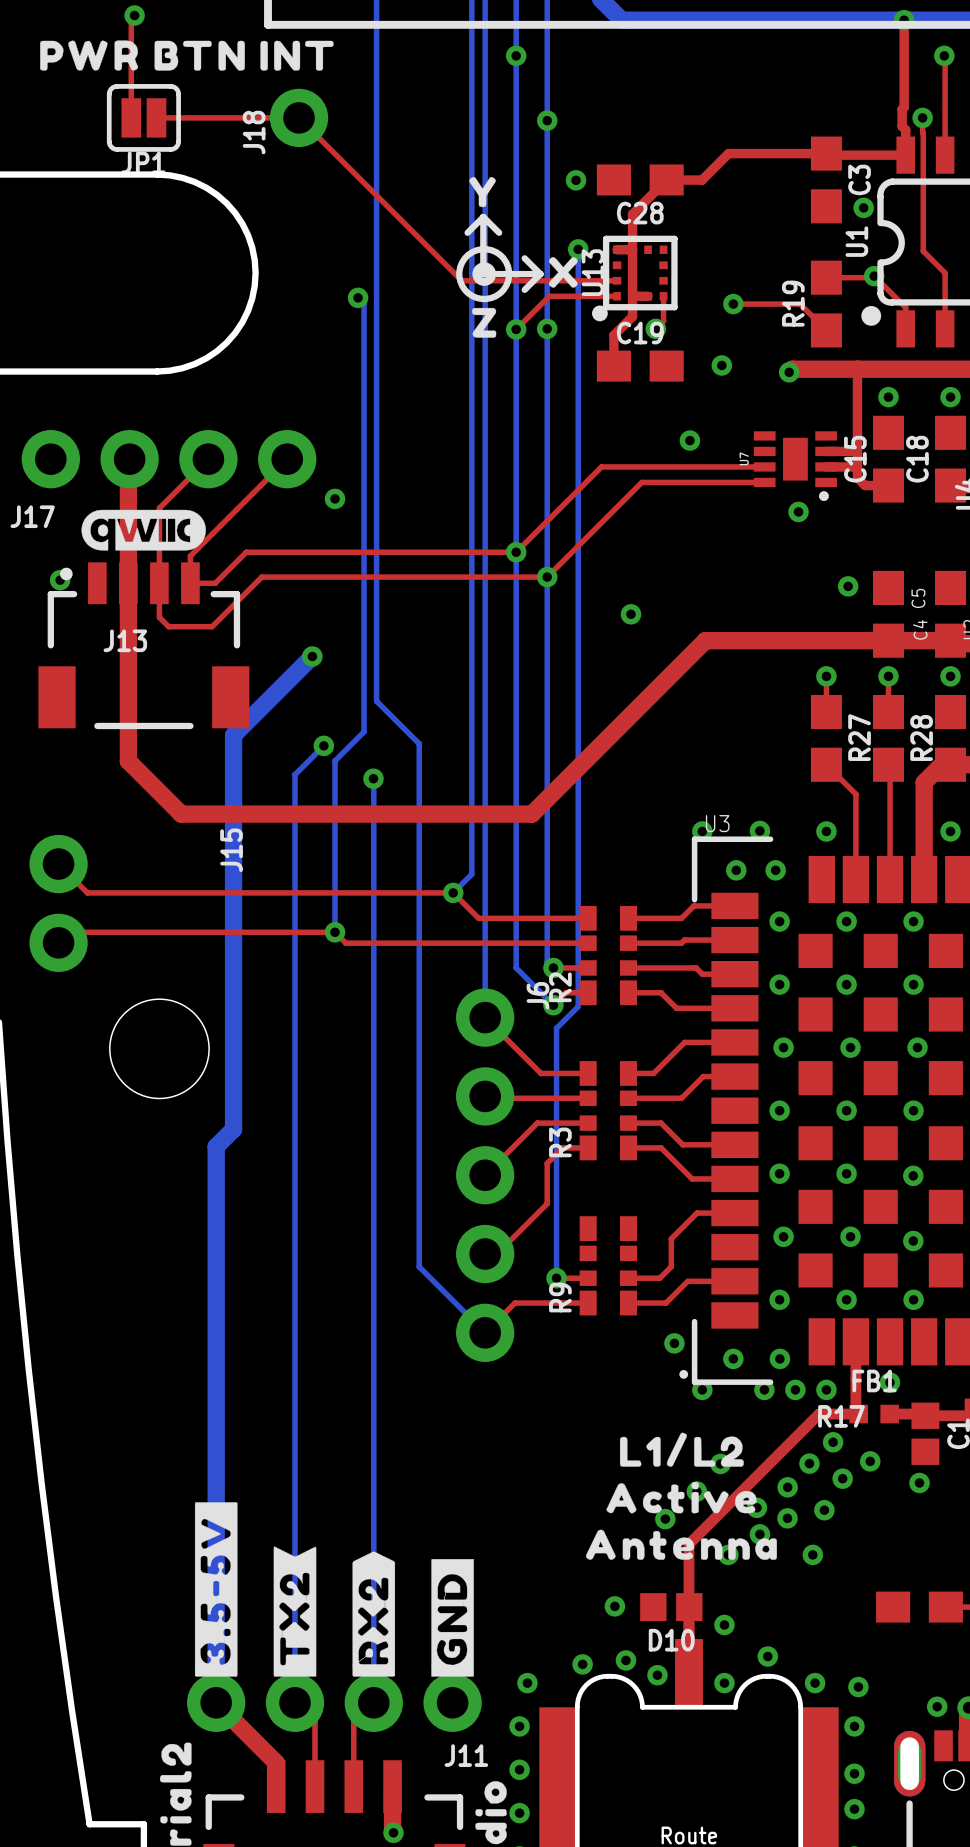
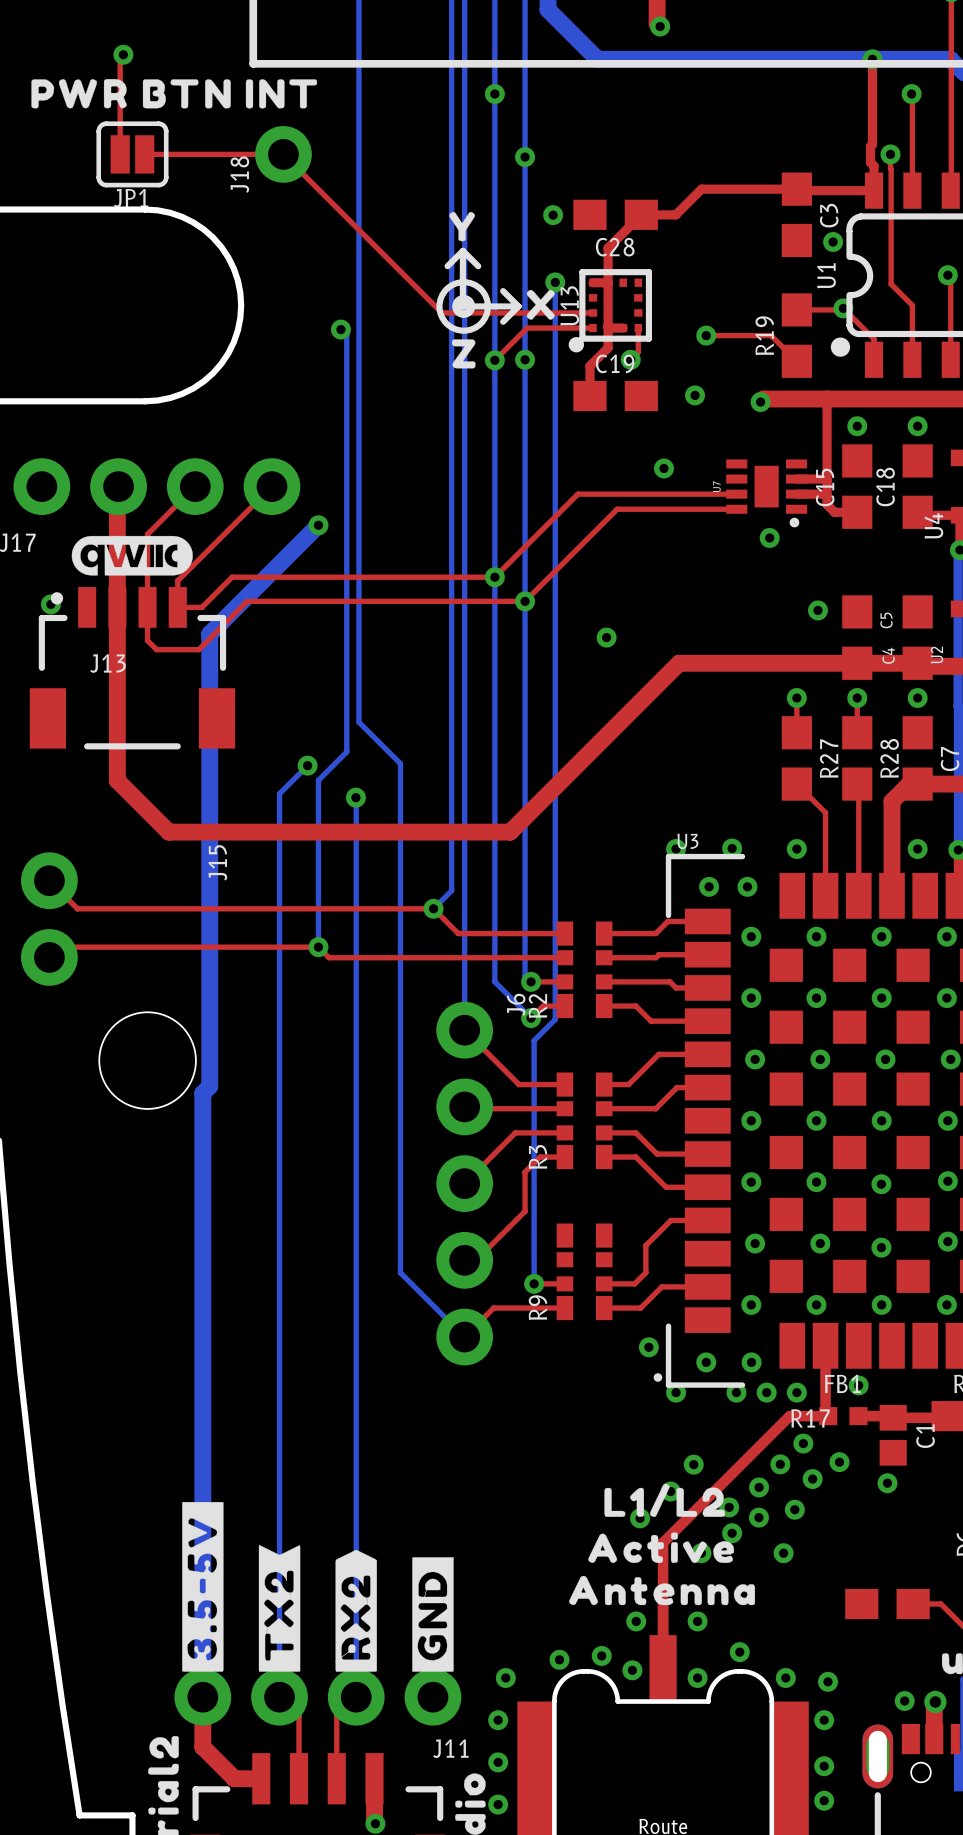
bottom track: (312, 656) (233, 735) (233, 1129) (216, 1146) -> (318, 525) (209, 634) (209, 1086) (202, 1093) (202, 1155)
via: (312, 656) -> none
drawing position: (681, 1449) -> (664, 1500)
drawing position: (681, 1497) -> (661, 1547)
drawing position: (681, 1544) -> (662, 1590)
via position: (614, 1606) -> (636, 1621)
D10: (671, 1607) -> none
top track: (216, 1702) (276, 1762) (276, 1786) -> (202, 1697) (202, 1747) (234, 1778) (261, 1778)

